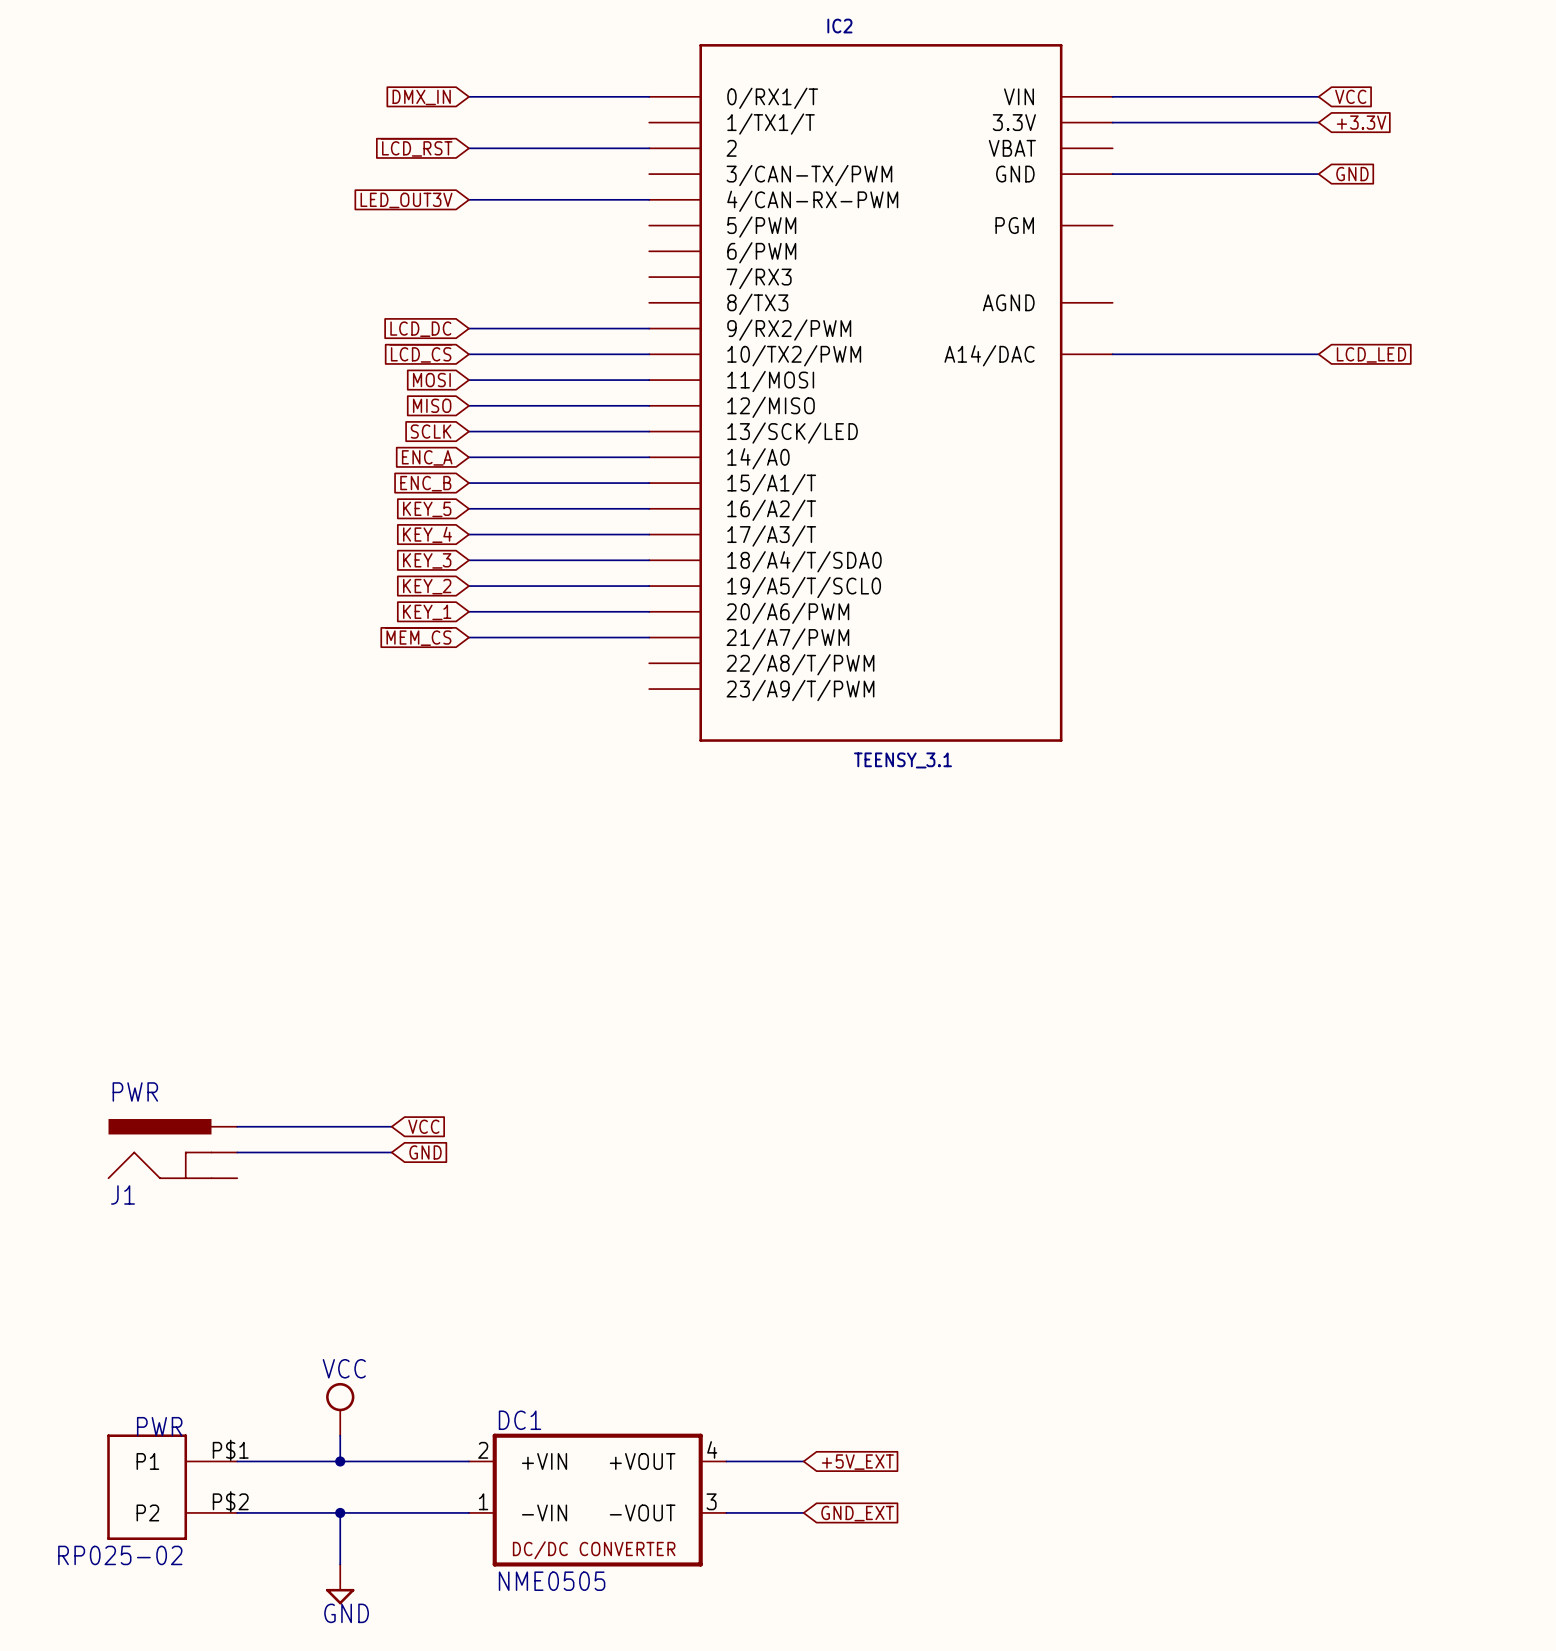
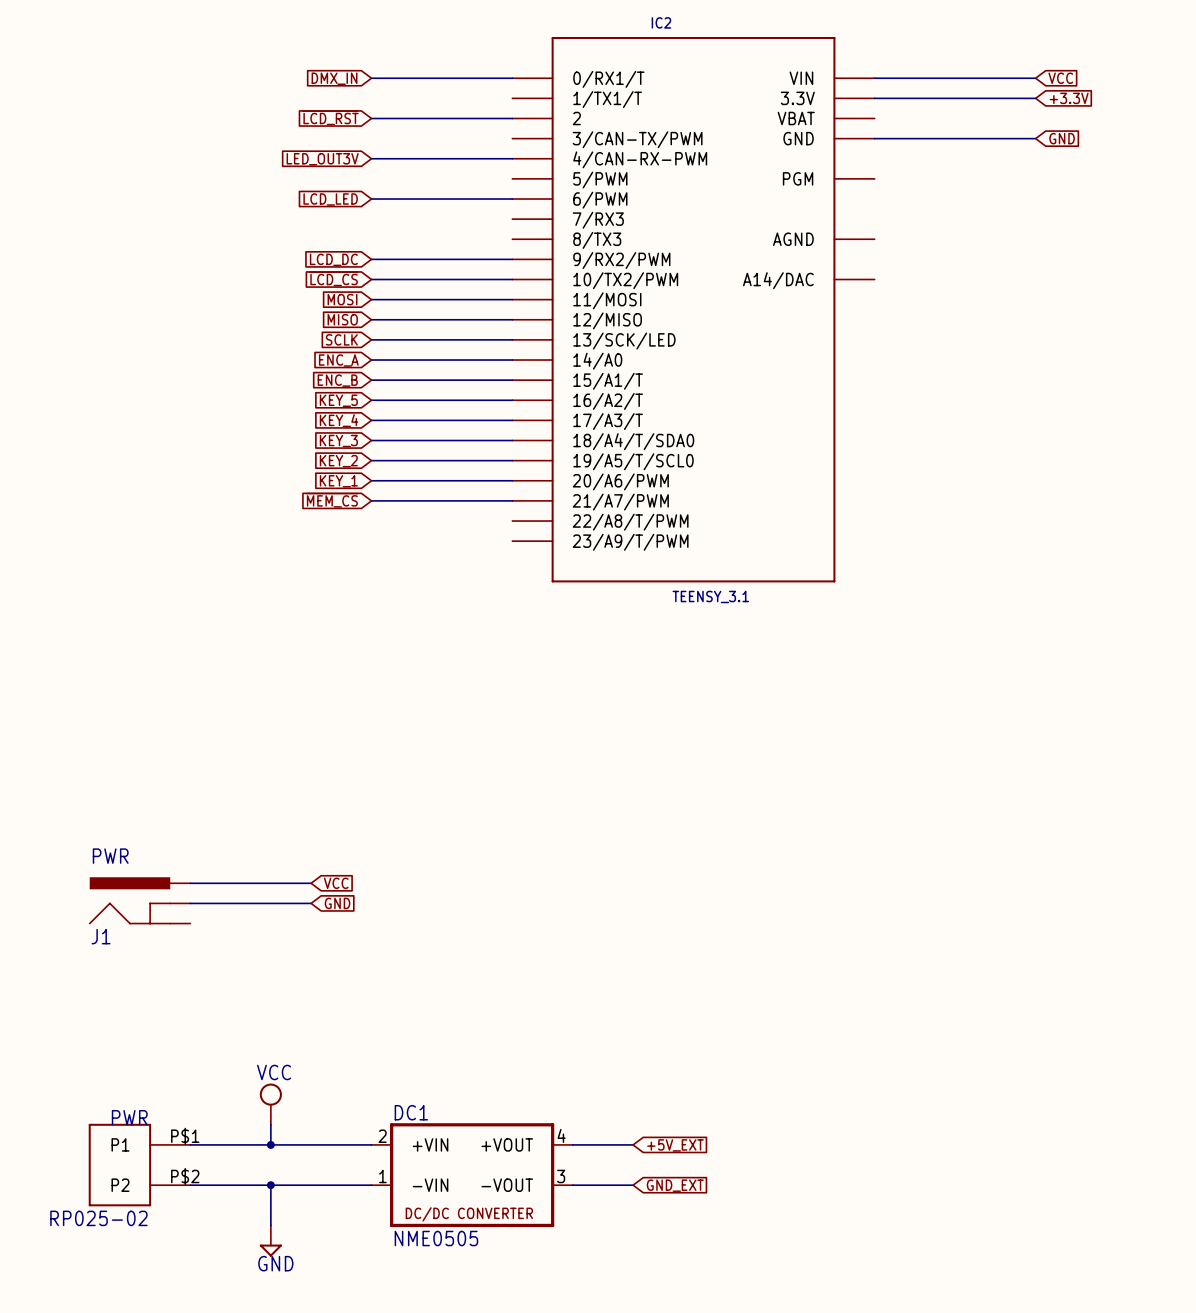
global label: none -> LCD_LED (330, 199)
wire: none -> (371, 199) (512, 199)
wire: (1112, 354) (1318, 354) -> none
global label: LCD_LED (1371, 354) -> none

